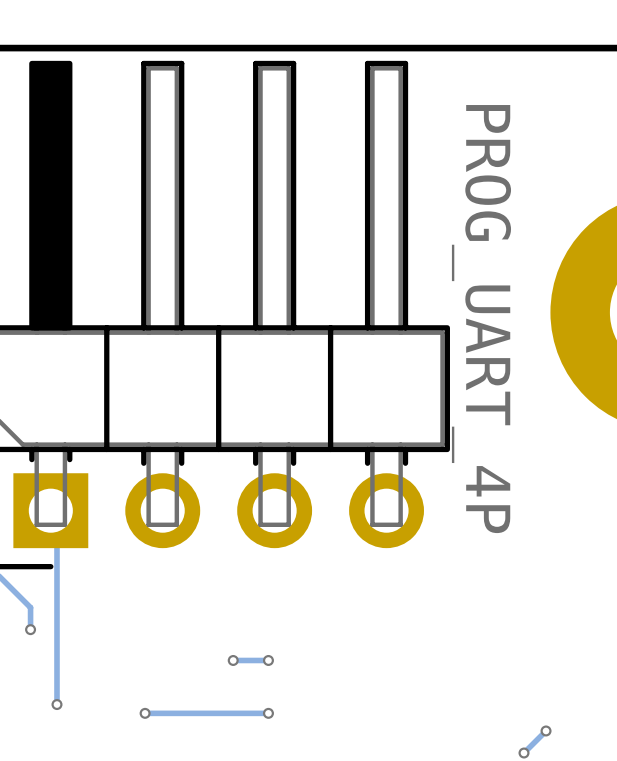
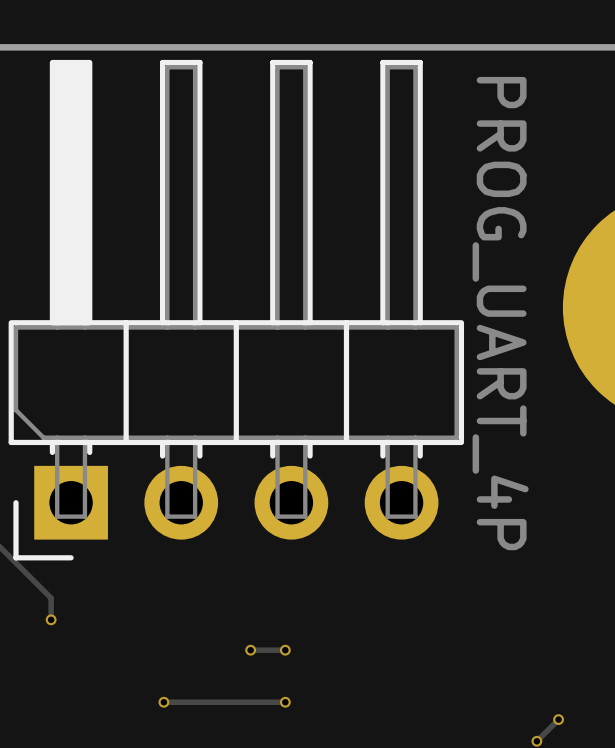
track: (56, 515) (56, 704) -> none
via: (56, 704) -> none

